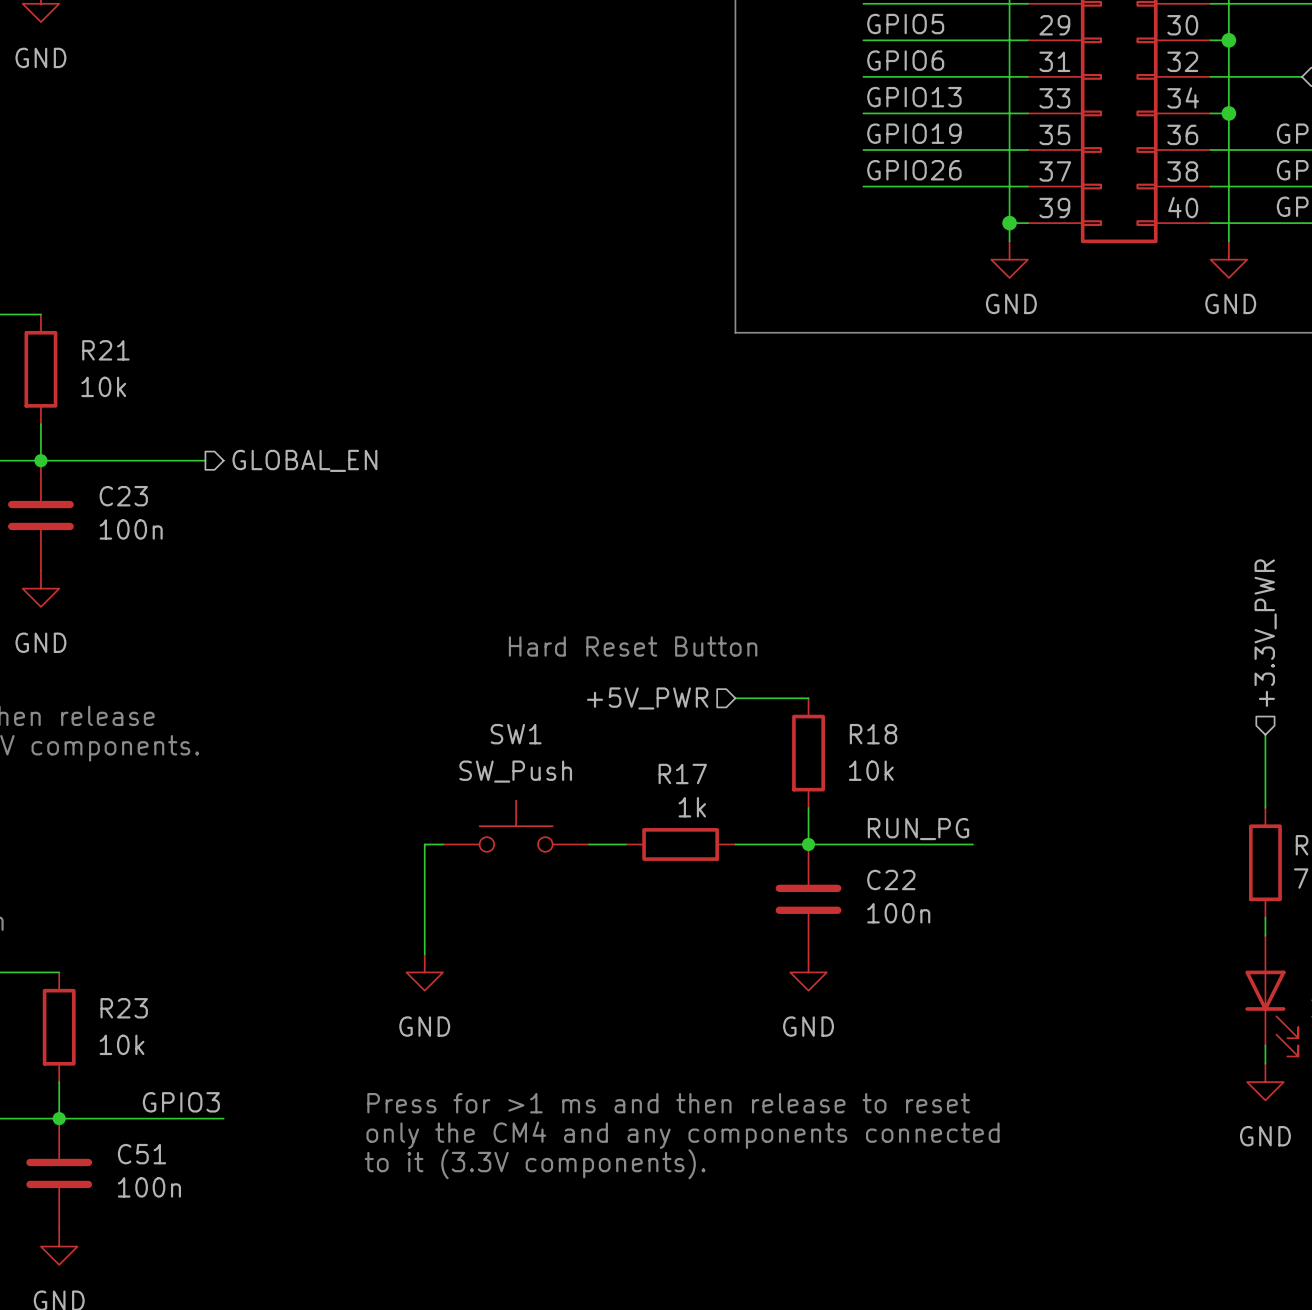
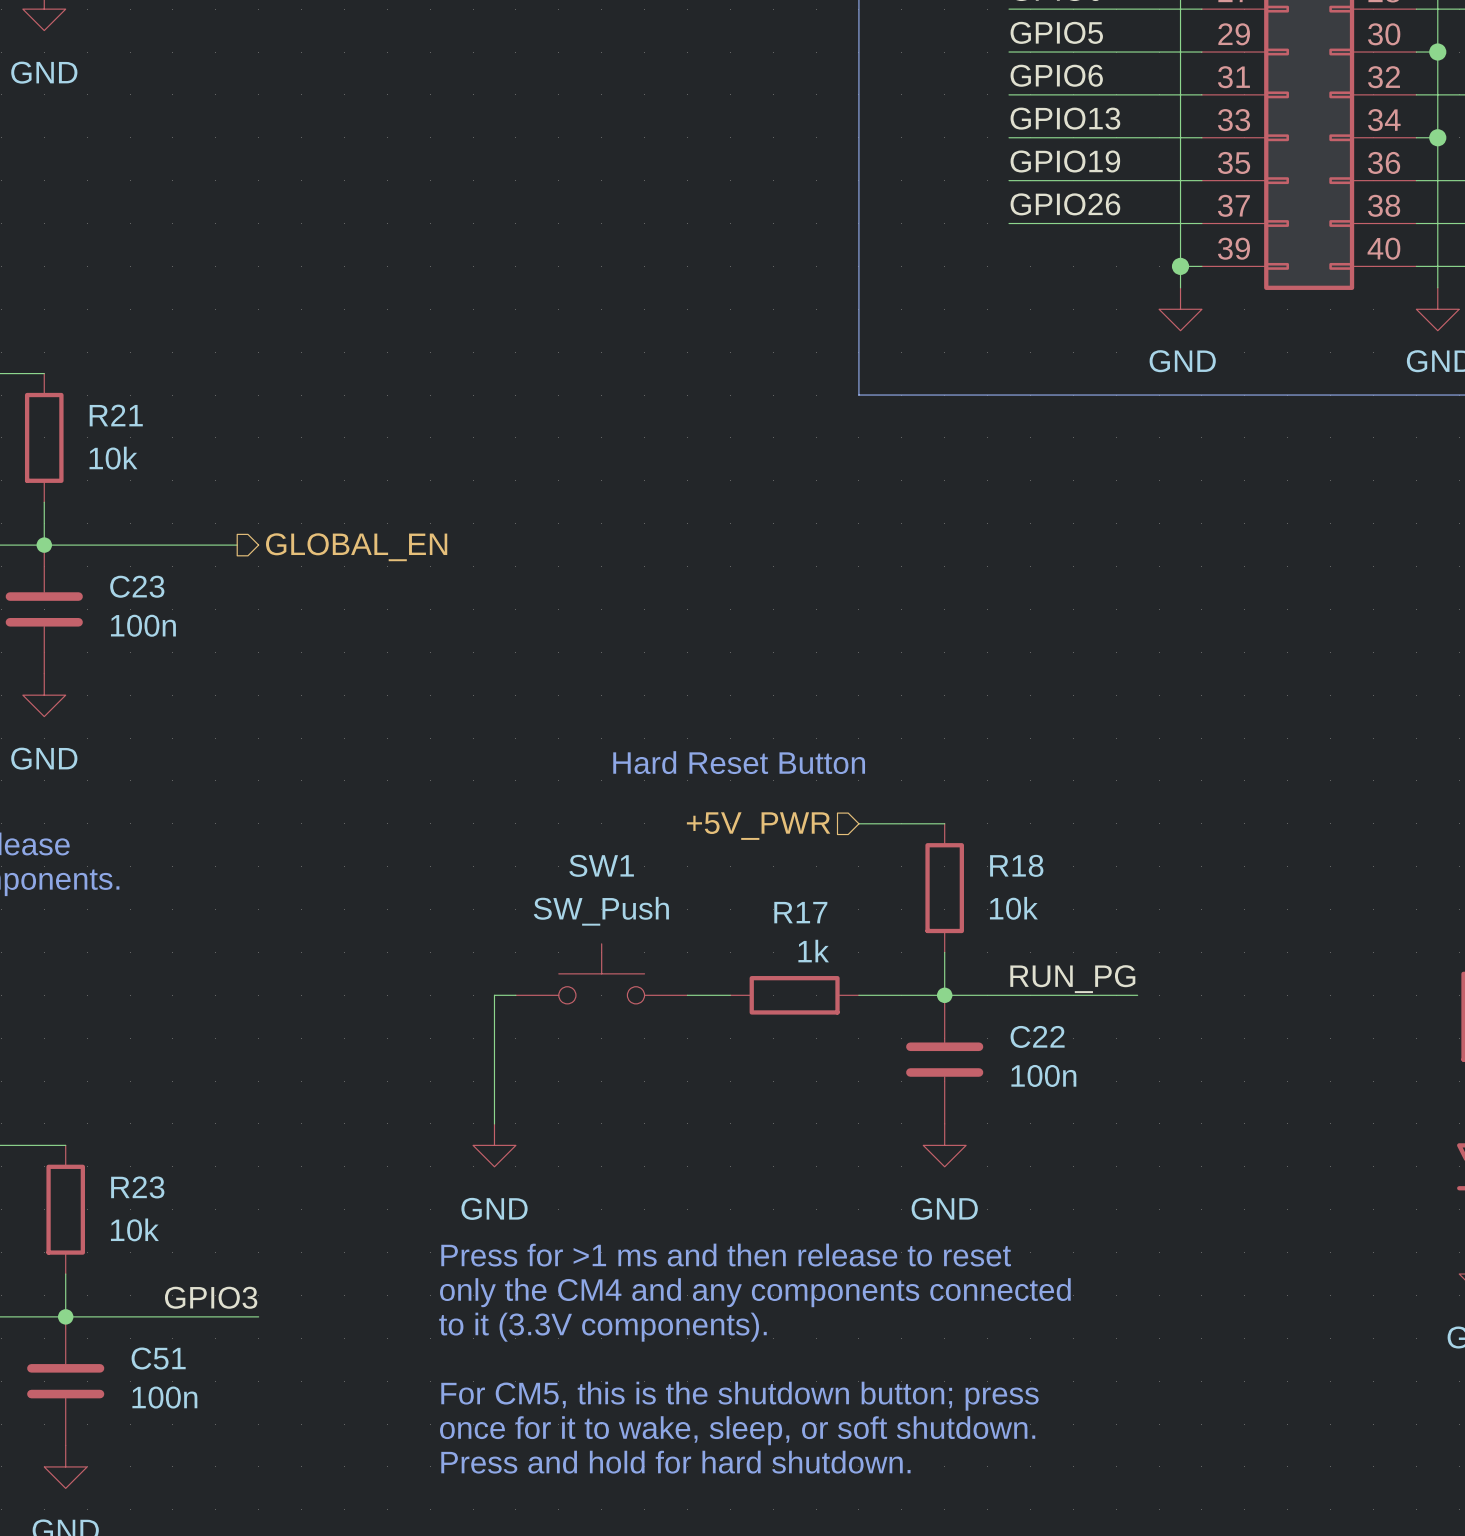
text position: Press for >1 ms and then release to reset (668, 1103) -> Press for >1 ms and then release to reset (726, 1255)
text position: only the CM4 and any components connected (683, 1135) -> only the CM4 and any components connected (755, 1292)
text position: to it (3.3V components). (535, 1164) -> to it (3.3V components). (602, 1327)
text: none -> For CM5, this is the shutdown button; press (739, 1396)
text: none -> once for it to wake, sleep, or soft shutdown. (737, 1430)
text: none -> Press and hold for hard shutdown. (675, 1462)

